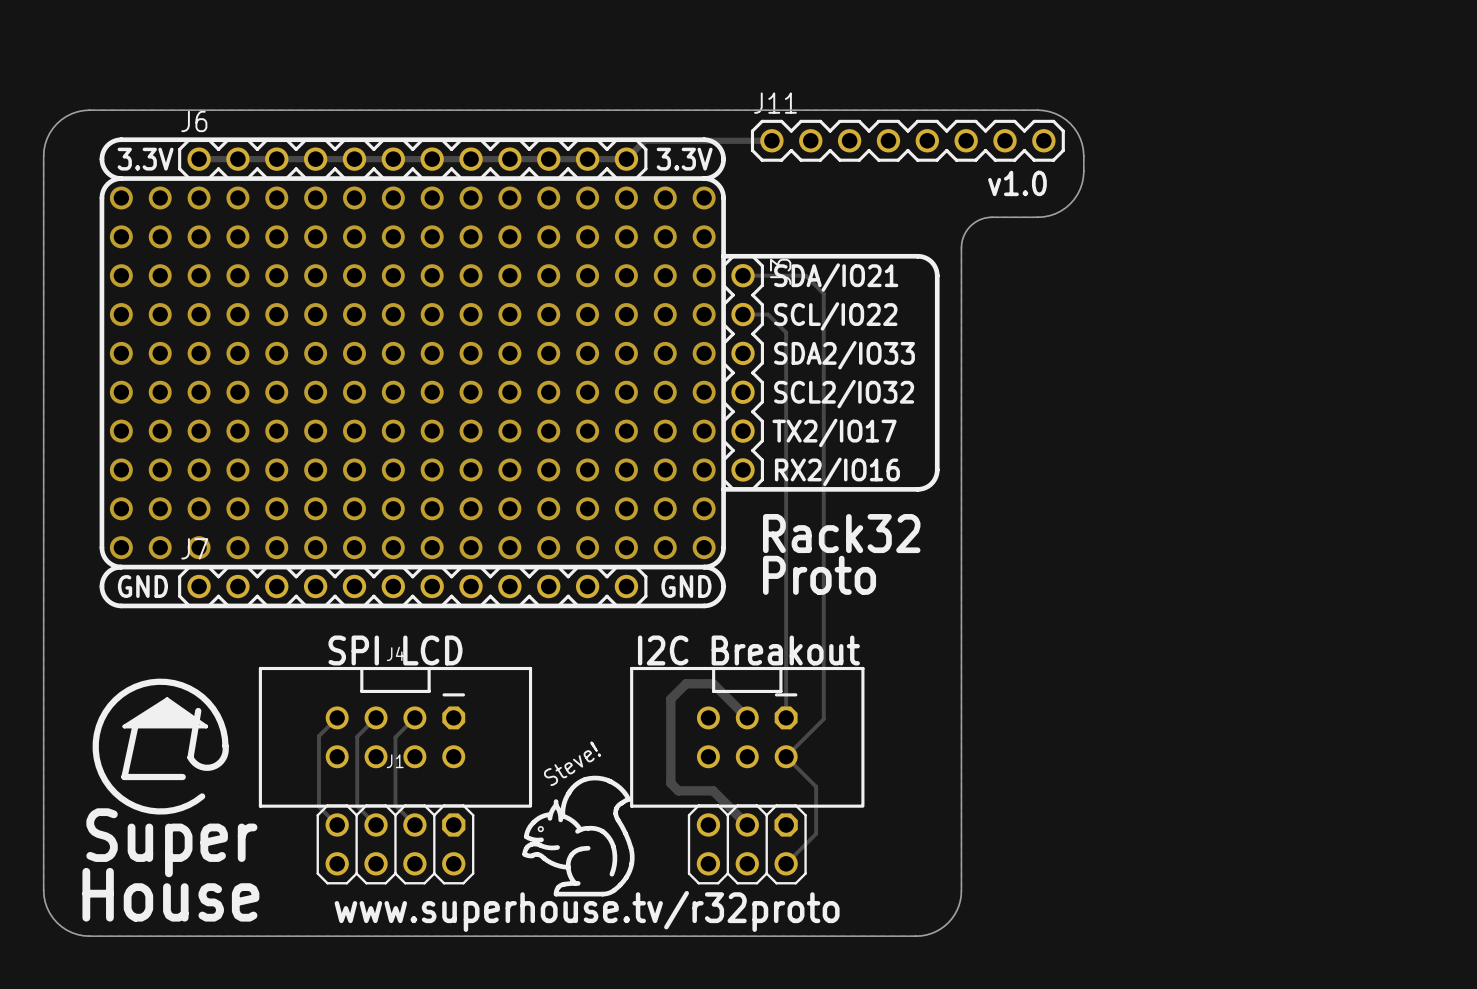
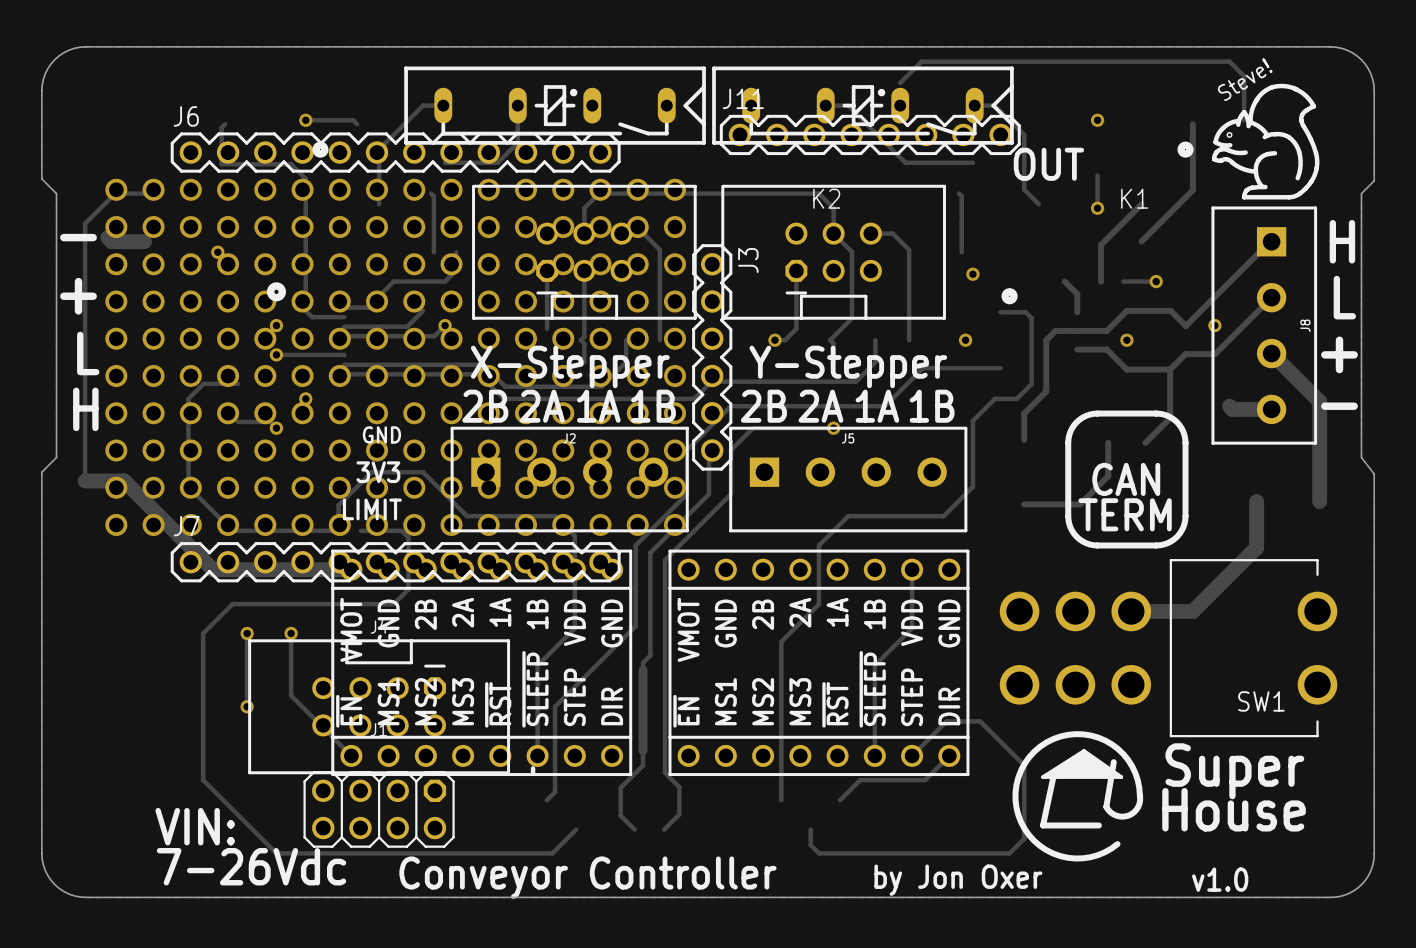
text: none -> Steve! (1245, 79)
track: none -> (900, 83) (921, 61) (1229, 61) (1244, 76) (1244, 120)
line: none -> (1294, 88) (1305, 95) (1313, 106) (1304, 112) (1301, 119) (1316, 153) (1315, 171) (1308, 184) (1294, 196) (1244, 197) (1249, 188) (1265, 187)
line: none -> (1296, 89) (1284, 86) (1272, 87) (1262, 92) (1255, 101)
line: none -> (1257, 99) (1251, 110) (1250, 123)
track: none -> (443, 105) (423, 105) (379, 149) (379, 204)
track: none -> (517, 105) (517, 142) (497, 162) (445, 162)
K2: none -> (555, 105)
track: none -> (825, 105) (848, 105) (905, 162) (972, 162)
K1: none -> (862, 105)
track: none -> (974, 105) (994, 105) (1024, 134) (1024, 189) (1038, 204)
track: none -> (305, 120) (353, 120) (357, 124)
via: none -> (305, 120)
via: none -> (1097, 120)
line: none -> (1238, 121) (1225, 126) (1216, 137) (1215, 142) (1230, 145)
line: none -> (1250, 122) (1260, 127) (1267, 135)
track: none -> (225, 124) (221, 127) (221, 164) (291, 164) (305, 178) (305, 310) (312, 317) (344, 317)
track: none -> (1192, 124) (1192, 190) (1141, 241)
line: none -> (1238, 124) (1244, 112) (1248, 126)
drawing: none -> [1226, 131, 1233, 138]
track: (771, 140) (644, 140) (626, 159) (199, 159) -> none
line: none -> (1264, 137) (1279, 134) (1288, 137) (1293, 141) (1300, 156) (1297, 178)
drawing: none -> [312, 141, 329, 158]
drawing: none -> [1177, 141, 1194, 158]
board edge: (43, 156) (47, 138) (57, 123) (71, 113) (89, 110) (1037, 110) (1055, 113) (1070, 123) (1080, 138) (1083, 156) (1082, 183) (1077, 194) (1070, 203) (1060, 211) (1043, 216) (992, 217) (980, 219) (967, 229) (961, 243) (961, 895) (957, 910) (944, 926) (930, 933) (915, 936) -> (41, 149) (41, 90) (45, 73) (59, 55) (80, 47) (1330, 46) (1347, 50) (1361, 59) (1370, 73) (1374, 90) (1374, 180) (1361, 193) (1361, 457) (1374, 474) (1374, 853) (1373, 863) (1367, 876) (1353, 890) (1335, 897) (877, 897)
text: 3.3V (145, 159) -> none
text: 3.3V (684, 159) -> none
line: none -> (1245, 152) (1220, 149) (1216, 152) (1214, 159) (1220, 160) (1225, 159)
line: none -> (1274, 153) (1266, 154) (1260, 158) (1255, 170)
line: none -> (1226, 159) (1243, 169) (1255, 171) (1257, 179) (1262, 187)
text: none -> OUT (1048, 164)
line: (121, 178) (704, 178) -> none
line: (121, 178) (107, 184) (101, 197) (101, 547) (107, 561) (121, 567) -> none
line: (121, 178) (107, 172) (101, 159) (107, 145) (121, 139) (706, 139) (719, 147) (723, 159) (717, 172) (704, 178) -> none
line: (704, 178) (717, 184) (723, 197) (723, 547) (717, 561) (704, 567) -> none
text: v1.0 (1017, 183) -> none
track: none -> (1097, 175) (1097, 208)
board edge: (43, 186) (43, 492) -> (41, 178) (56, 193) (56, 457) (41, 472)
track: none -> (159, 193) (115, 193) (85, 223) (85, 480) (124, 480) (213, 569) (351, 569)
track: none -> (431, 193) (433, 196) (433, 252)
track: none -> (959, 193) (961, 196) (961, 252)
track: none -> (1141, 204) (1101, 244) (1101, 281)
via: none -> (1097, 208)
track: none -> (584, 233) (584, 208) (599, 193) (818, 193) (833, 208) (833, 233) (851, 251) (851, 318) (830, 340) (833, 343) (833, 362)
track: none -> (621, 233) (643, 233) (659, 249) (659, 340)
track: none -> (870, 233) (892, 233) (909, 249) (909, 340)
line: none -> (63, 237) (93, 237)
track: none -> (107, 237) (111, 241) (144, 241)
track: none -> (1271, 241) (1185, 326)
text: none -> H (1342, 241)
line: (723, 256) (920, 256) (933, 263) (937, 275) (937, 469) (931, 483) (917, 489) (723, 489) -> none
via: none -> (217, 252)
track: none -> (456, 252) (456, 270) (445, 281) (393, 281) (367, 307) (344, 307)
part: none -> (584, 252)
part: none -> (833, 252)
track: (743, 275) (805, 275) (823, 293) (823, 719) (786, 756) (816, 786) (816, 833) (786, 863) -> none
text: SDA/IO21 (836, 277) -> none
track: none -> (547, 270) (547, 328)
track: none -> (584, 270) (584, 336) (580, 340) (584, 343) (584, 362)
track: none -> (796, 270) (796, 328) (784, 340) (774, 340)
via: none -> (972, 274)
line: none -> (78, 281) (78, 310)
track: none -> (1064, 281) (1077, 294) (1077, 312)
track: none -> (1123, 281) (1156, 281)
via: none -> (1156, 281)
drawing: none -> [266, 282, 286, 302]
drawing: none -> [1001, 288, 1018, 305]
line: none -> (63, 296) (93, 296)
track: none -> (1271, 297) (1215, 354) (1185, 354) (1170, 369)
text: none -> L (1344, 297)
track: (743, 314) (768, 314) (786, 332) (786, 717) -> none
text: SCL/IO22 (835, 316) -> none
track: none -> (423, 310) (407, 326) (344, 326)
track: none -> (1000, 312) (1025, 312) (1031, 318) (1031, 384) (1016, 398) (994, 398) (972, 420) (972, 486) (943, 516) (848, 516) (818, 545) (818, 604) (781, 641) (781, 800)
via: none -> (276, 325)
track: none -> (445, 325) (434, 336) (344, 336)
via: none -> (445, 325)
via: none -> (1214, 325)
J8: none -> (1264, 325)
track: none -> (1185, 325) (1170, 310) (1126, 310) (1106, 330) (1055, 330) (1046, 340) (1046, 391) (1024, 413) (1024, 439)
track: none -> (626, 340) (626, 362) (601, 386) (505, 386) (483, 364) (344, 364)
via: none -> (774, 340)
track: none -> (875, 340) (875, 362) (855, 381) (711, 381) (694, 398) (503, 398) (479, 374) (344, 374)
via: none -> (965, 340)
via: none -> (1126, 340)
line: none -> (1339, 340) (1339, 369)
text: SDA2/IO33 (844, 355) -> none
track: none -> (1077, 349) (1106, 349) (1126, 369) (1170, 369)
text: none -> L (88, 353)
track: none -> (1271, 353) (1319, 401) (1319, 501)
track: none -> (276, 354) (344, 355)
via: none -> (276, 354)
line: none -> (1324, 354) (1354, 354)
text: none -> X-Stepper (570, 366)
text: none -> Y-Stepper (848, 366)
track: none -> (1000, 368) (923, 368) (884, 406) (730, 406) (687, 450) (687, 494) (635, 545) (635, 626) (555, 706) (555, 792) (546, 800)
track: none -> (1170, 369) (1170, 418) (1145, 442)
text: SCL2/IO32 (844, 394) -> none
track: none -> (237, 383) (203, 383) (188, 398) (188, 486) (232, 530) (338, 530) (338, 505) (371, 472) (423, 472) (467, 516) (555, 516) (574, 535) (574, 628) (537, 665) (537, 755)
via: none -> (305, 398)
text: none -> 2B (485, 406)
text: none -> 2A (542, 406)
text: none -> 1A (598, 406)
text: none -> 1B (653, 406)
text: none -> 2B (763, 406)
text: none -> 2A (820, 406)
text: none -> 1A (877, 406)
text: none -> 1B (932, 406)
track: none -> (1229, 406) (1232, 409) (1271, 409)
line: none -> (1324, 406) (1354, 406)
text: none -> H (85, 409)
line: none -> (1097, 413) (1160, 413) (1170, 417) (1181, 428) (1185, 442) (1185, 520) (1181, 530) (1170, 541) (1156, 545) (1093, 545) (1082, 541) (1072, 530) (1068, 516) (1069, 435) (1079, 419) (1097, 413)
text: TX2/IO17 (834, 432) -> none
track: none -> (237, 421) (270, 421) (276, 428)
via: none -> (276, 428)
track: none -> (833, 428) (752, 428) (730, 450) (730, 494) (665, 560) (665, 772) (679, 787) (679, 814) (664, 829)
via: none -> (833, 428)
text: none -> GND (381, 434)
track: none -> (1108, 442) (1108, 476) (1079, 504) (1024, 504)
text: RX2/IO16 (837, 471) -> none
text: none -> 3V3 (378, 472)
J2: none -> (569, 479)
J5: none -> (848, 479)
text: none -> CAN (1126, 479)
track: none -> (1256, 501) (1256, 547) (1192, 611) (1131, 611)
text: none -> LIMIT (372, 509)
text: Rack32 (841, 533) -> none
text: none -> TERM (1125, 514)
track: none -> (360, 530) (401, 530) (408, 537) (408, 589) (393, 604) (232, 604) (203, 633) (203, 780) (276, 853) (552, 853) (576, 829)
line: (121, 567) (704, 567) -> none
line: (121, 567) (107, 572) (101, 586) (107, 600) (121, 605) (706, 605) (719, 598) (723, 586) (717, 572) (704, 567) -> none
text: Proto (819, 575) -> none
text: GND (142, 586) -> none
text: GND (686, 586) -> none
track: none -> (912, 569) (912, 628) (874, 665) (874, 755)
text: SPI LCD (395, 650) -> none
text: I2C Breakout (748, 650) -> none
track: none -> (247, 633) (247, 706)
via: none -> (247, 633)
track: none -> (291, 633) (291, 695) (351, 755)
via: none -> (291, 633)
SW1: none -> (1168, 648)
part: none -> (481, 662)
part: none -> (818, 662)
line: (167, 699) (124, 726) (206, 726) (167, 699) -> none
track: (670, 699) (686, 683) (713, 683) (747, 717) -> (643, 670) (643, 662) (650, 655) (650, 552) (709, 494) (709, 457)
line: (167, 710) (159, 714) (178, 714) (167, 707) (143, 718) (186, 718) -> none
line: (198, 710) (190, 757) (201, 766) (213, 766) (221, 761) (225, 750) (223, 730) (217, 715) (208, 702) (196, 692) (181, 685) (166, 681) (142, 684) (128, 690) (115, 700) (101, 719) (96, 734) (95, 750) (98, 766) (109, 786) (121, 798) (134, 806) (157, 811) (173, 810) (188, 805) (202, 796) -> none
track: (337, 717) (318, 736) (318, 806) (337, 824) -> none
track: (376, 717) (357, 736) (357, 806) (376, 824) -> none
track: (414, 717) (395, 737) (395, 805) (414, 824) -> none
line: (132, 722) (194, 722) (167, 703) (136, 722) (124, 777) (182, 777) -> none
via: none -> (247, 706)
part: (747, 737) -> none
text: Steve! (572, 763) -> none
line: (608, 780) (620, 788) (628, 799) (618, 805) (615, 812) (631, 848) (630, 867) (623, 881) (608, 893) (556, 894) (557, 888) (561, 885) (578, 883) -> none
line: (611, 781) (598, 778) (585, 779) (575, 785) (568, 793) -> none
track: (670, 783) (678, 790) (713, 790) (747, 824) -> (643, 750) (643, 765) (620, 787) (620, 815) (634, 829)
line: none -> (1084, 750) (1043, 777) (1121, 777) (1084, 750)
track: none -> (912, 755) (946, 721) (980, 721) (1024, 765) (1024, 838) (1009, 853) (818, 853) (810, 845) (810, 829)
track: none -> (949, 755) (925, 780) (860, 780) (840, 800)
line: (569, 791) (564, 803) (562, 816) -> none
line: none -> (1084, 762) (1076, 765) (1095, 765) (1084, 758) (1061, 769) (1102, 769)
line: none -> (1113, 762) (1106, 806) (1116, 815) (1127, 815) (1135, 810) (1140, 800) (1137, 780) (1132, 766) (1123, 754) (1111, 744) (1098, 737) (1083, 734) (1060, 736) (1046, 742) (1034, 751) (1021, 770) (1016, 784) (1015, 799) (1018, 814) (1028, 835) (1039, 845) (1052, 853) (1075, 858) (1090, 857) (1104, 852) (1117, 844)
text: none -> Super (1234, 771)
line: none -> (1050, 773) (1110, 773) (1084, 754) (1054, 773) (1043, 825) (1098, 825)
line: (549, 814) (536, 820) (527, 831) (526, 836) (541, 839) -> none
line: (562, 816) (573, 821) (580, 829) -> none
line: (549, 818) (556, 805) (560, 819) -> none
drawing: [537, 826, 544, 833] -> none
line: (577, 831) (593, 828) (602, 831) (607, 835) (614, 851) (611, 874) -> none
text: Super (171, 842) -> none
part: (747, 844) -> none
text: none -> House (1234, 809)
line: (557, 847) (531, 844) (527, 847) (524, 854) (531, 855) (536, 854) -> none
line: (588, 848) (579, 849) (572, 853) (568, 866) -> none
line: (537, 854) (555, 864) (568, 867) (570, 876) (575, 883) -> none
text: none -> VIN: (195, 826)
text: House (170, 894) -> 7-26Vdc (251, 866)
text: www.superhouse.tv/r32proto (587, 911) -> none
text: none -> Conveyor Controller (587, 877)
text: none -> v1.0 (1220, 879)
text: none -> by Jon Oxer (958, 880)

